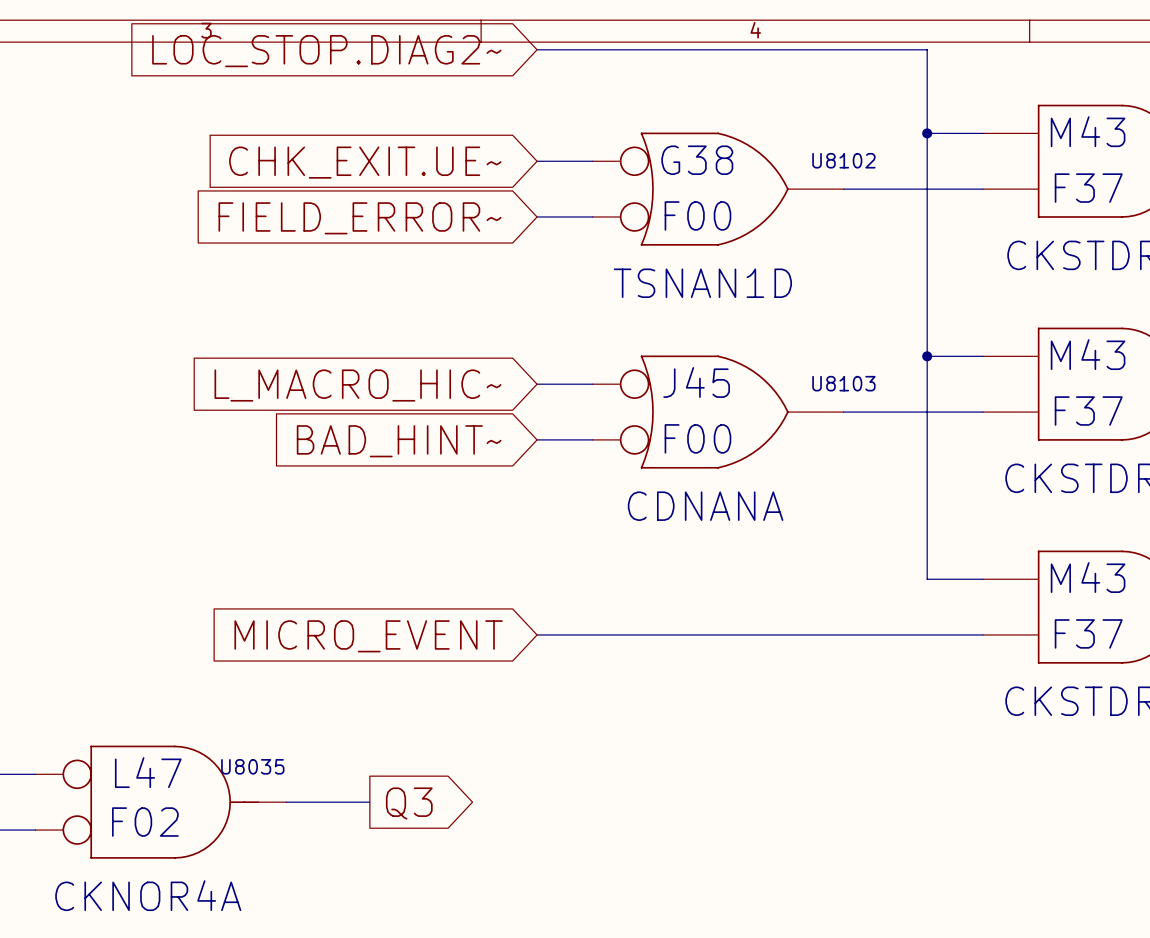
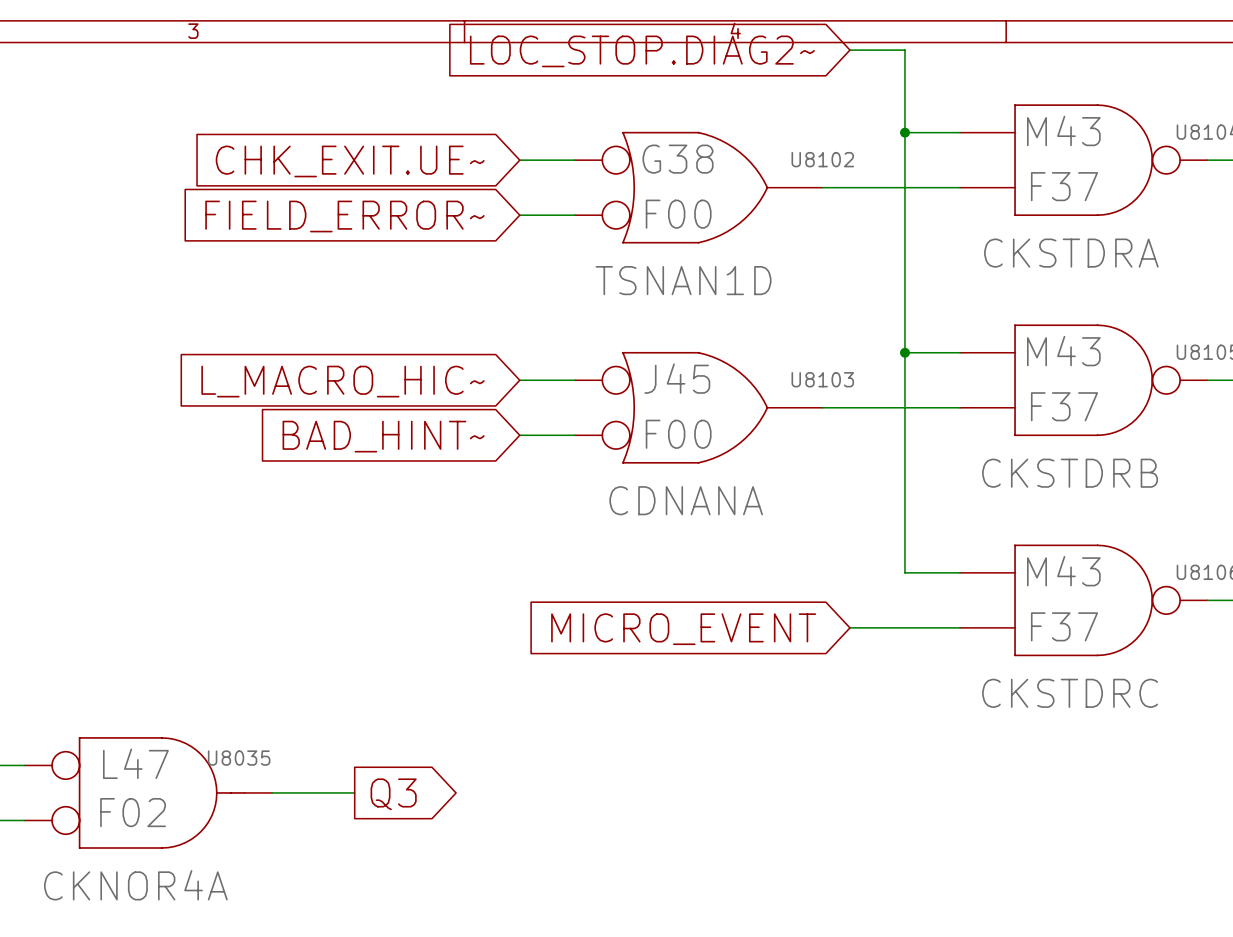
wire: (537, 49) (871, 49) -> none
global label: LOC_STOP.DIAG2~ (326, 51) -> none
global label: none -> LOC_STOP.DIAG2~ (642, 51)
wire: (537, 634) (871, 634) -> none
global label: MICRO_EVENT (368, 636) -> none
global label: none -> MICRO_EVENT (683, 629)

